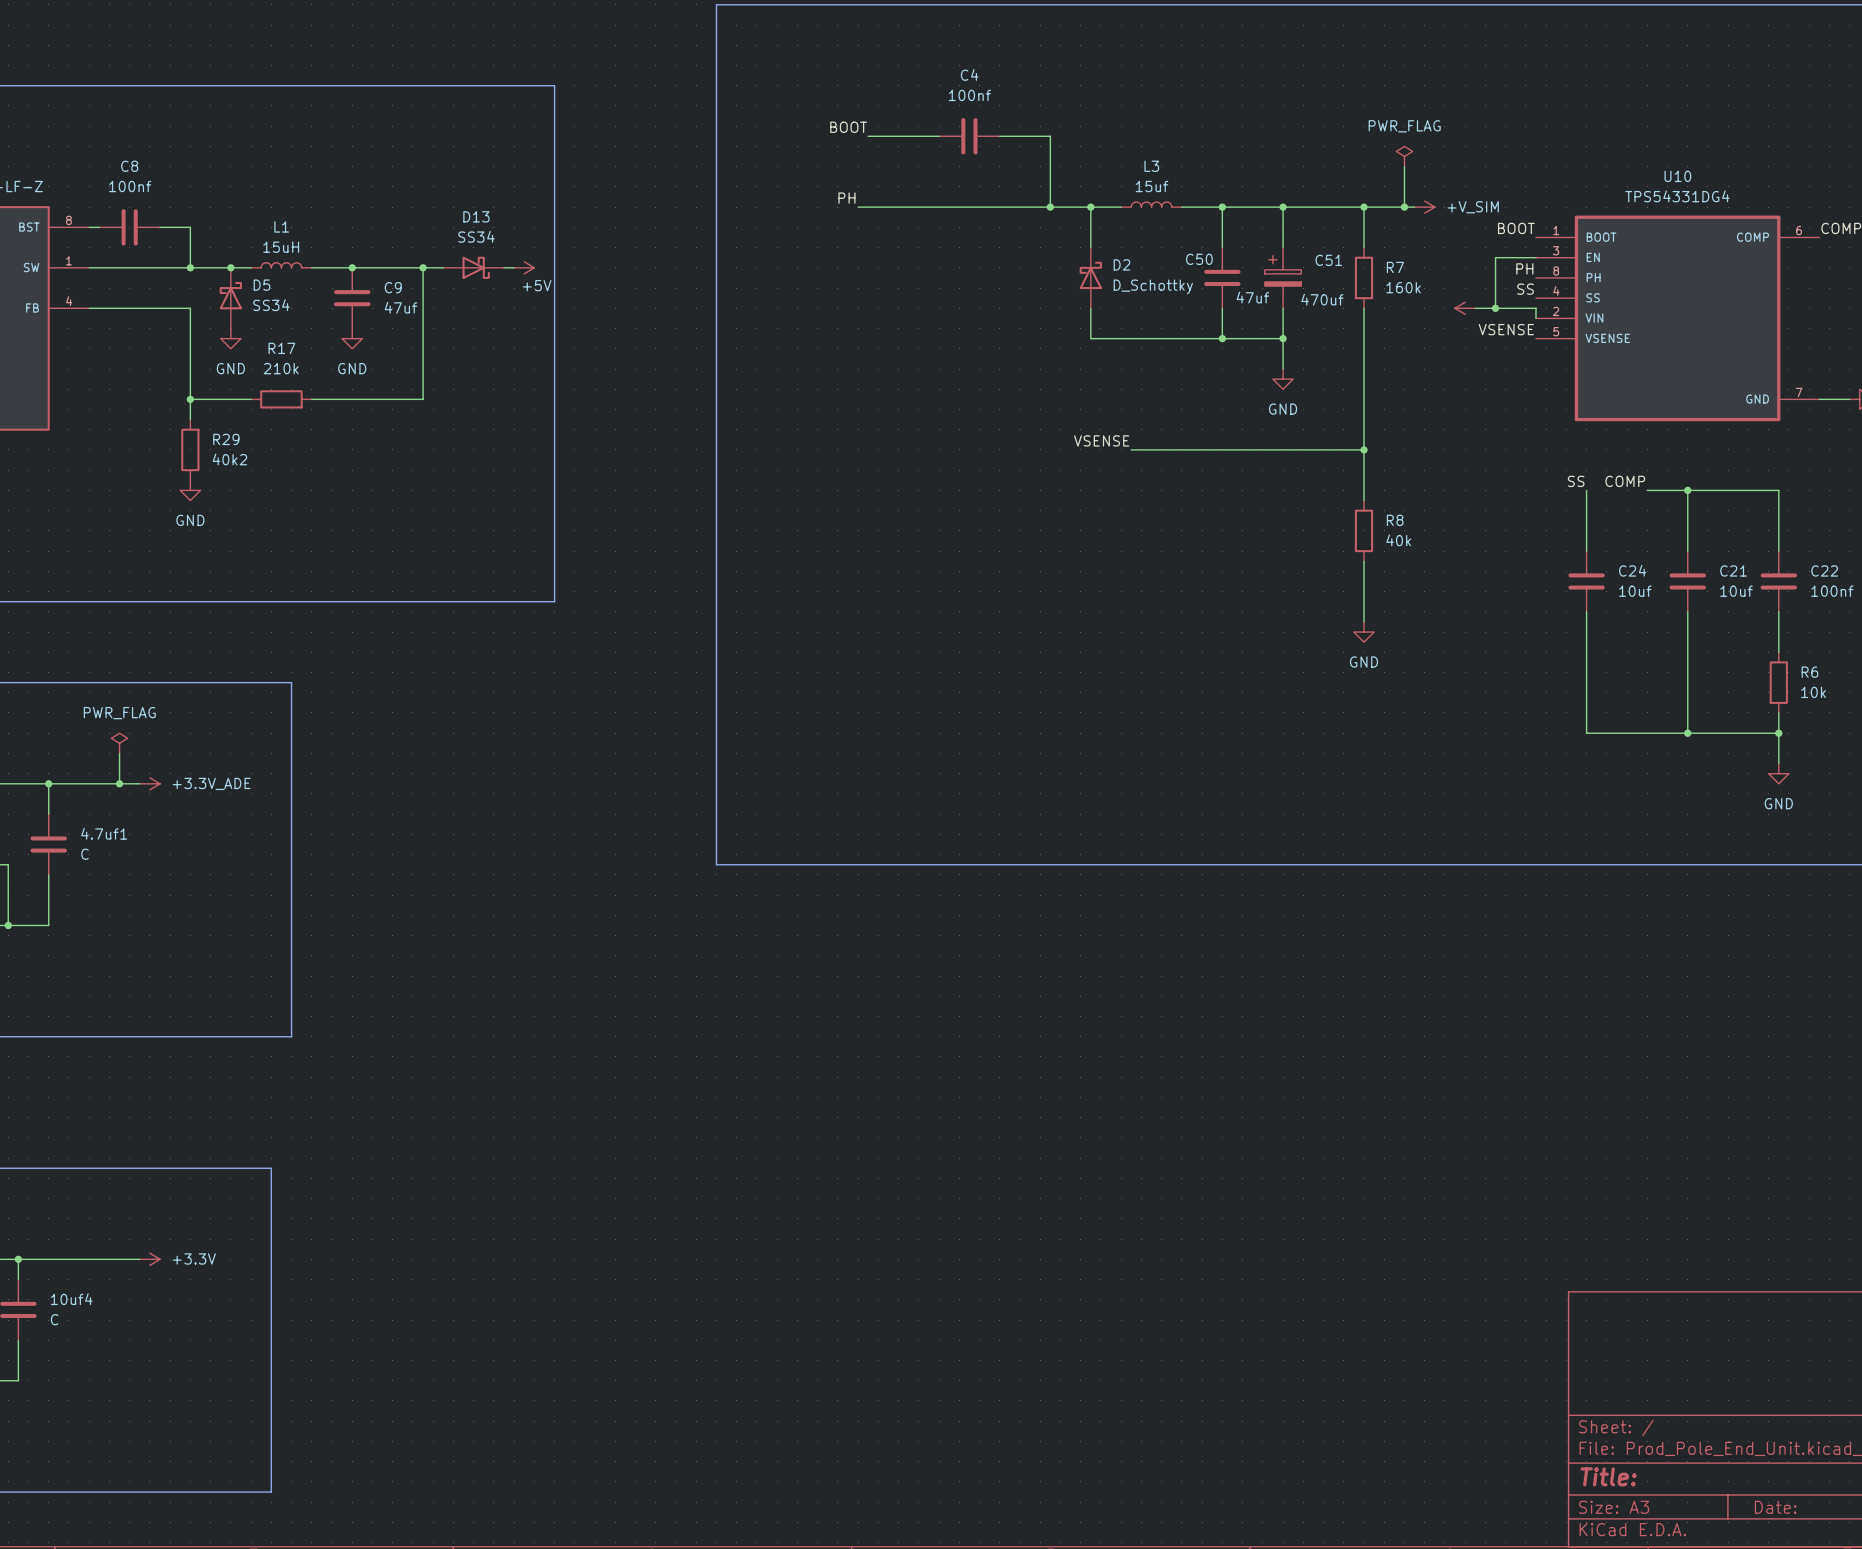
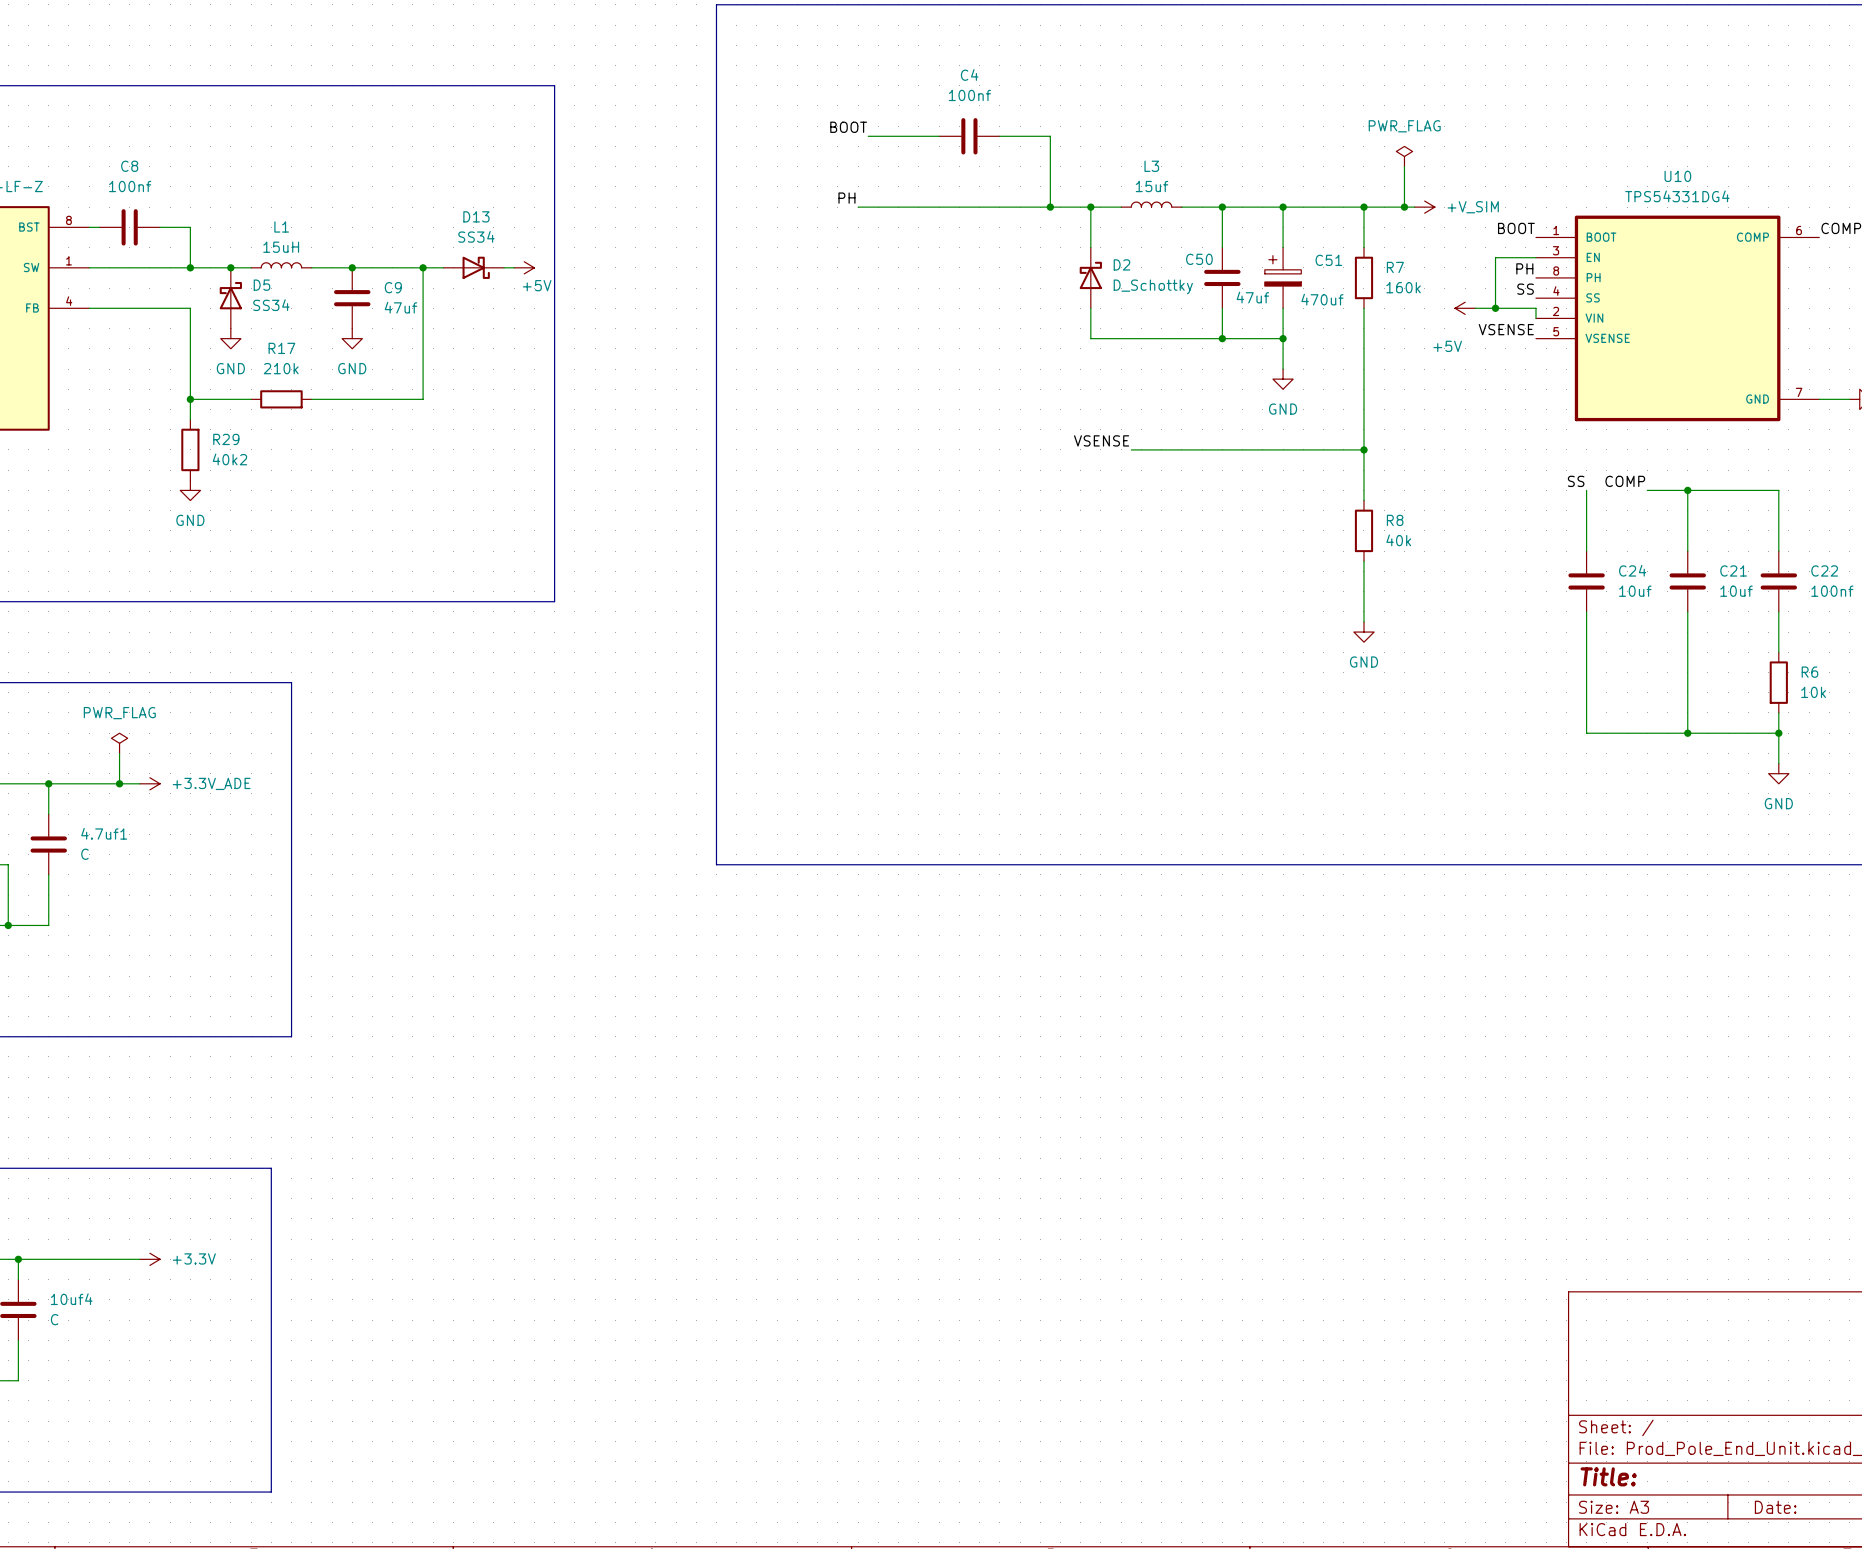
power symbol text: none -> +5V (1447, 346)

